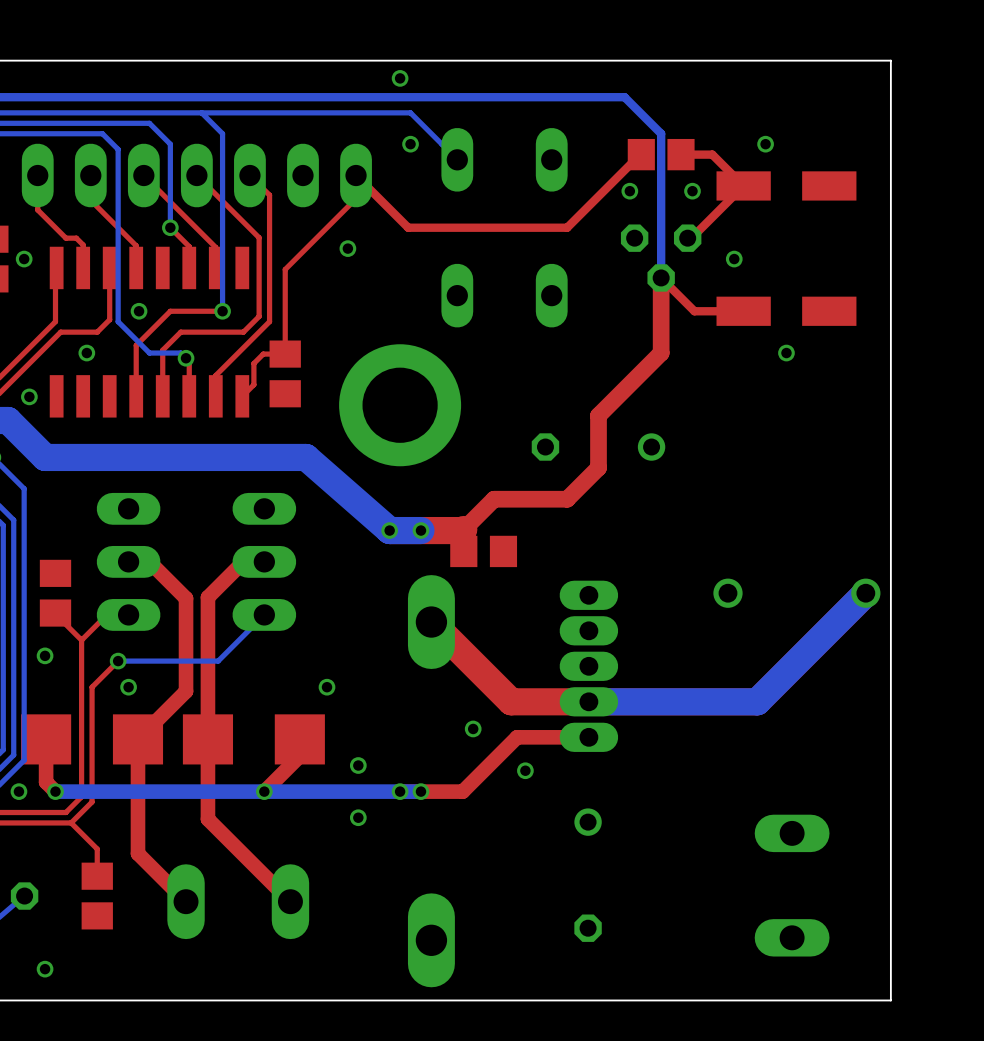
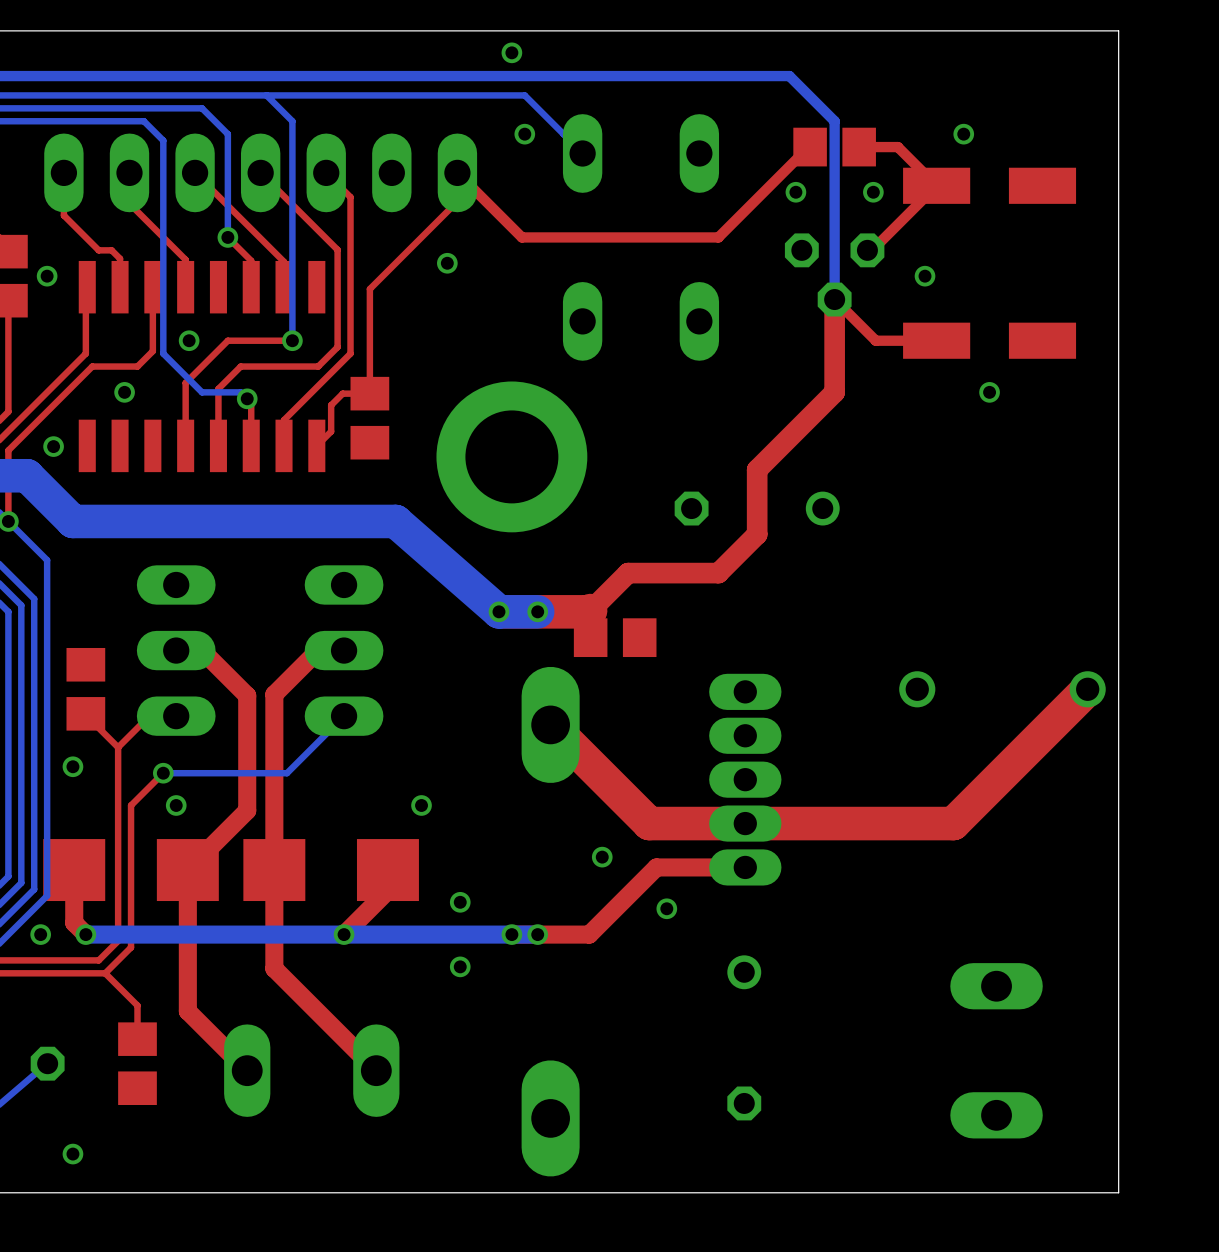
bottom track: (865, 593) (757, 701) (588, 701) -> none

